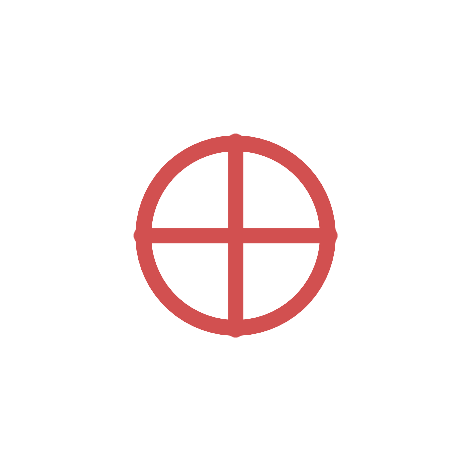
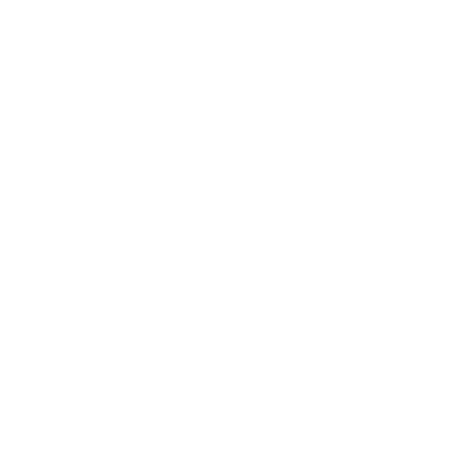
drawing: [135, 135, 336, 336] -> none
top track: (235, 141) (235, 330) -> none
top track: (141, 235) (330, 235) -> none

